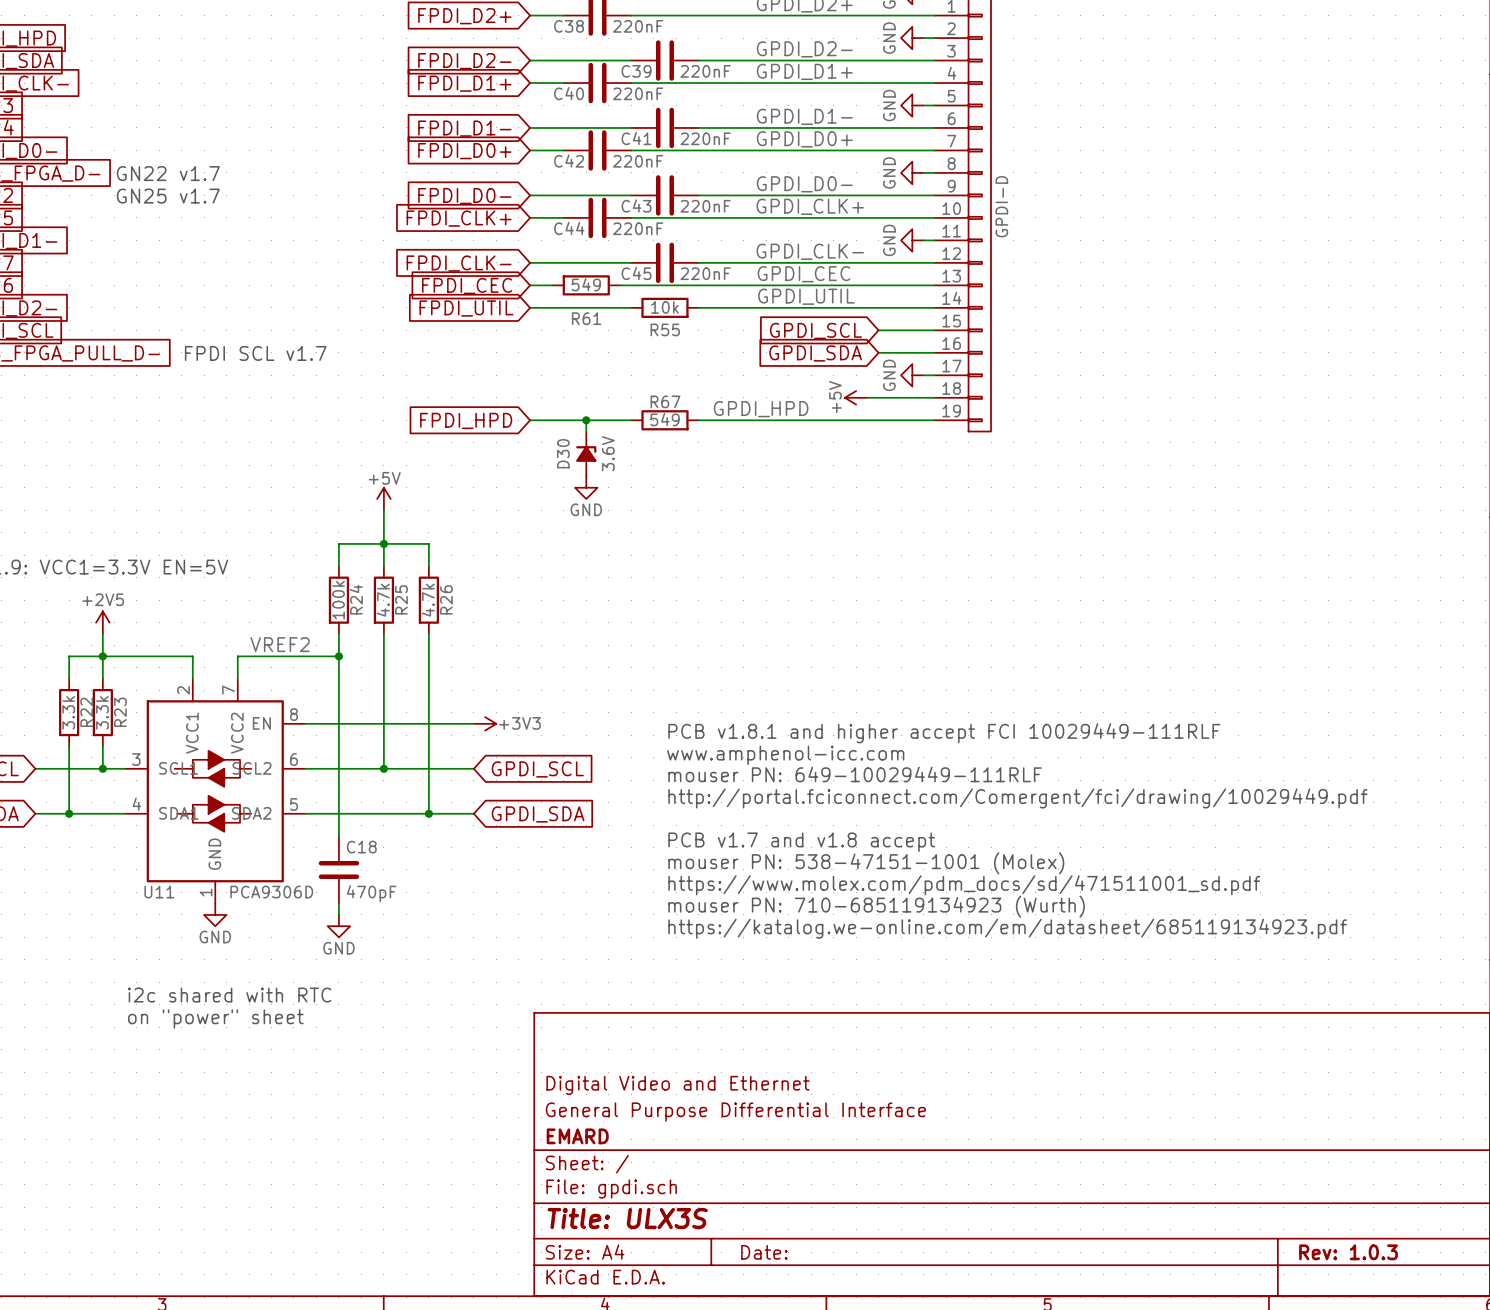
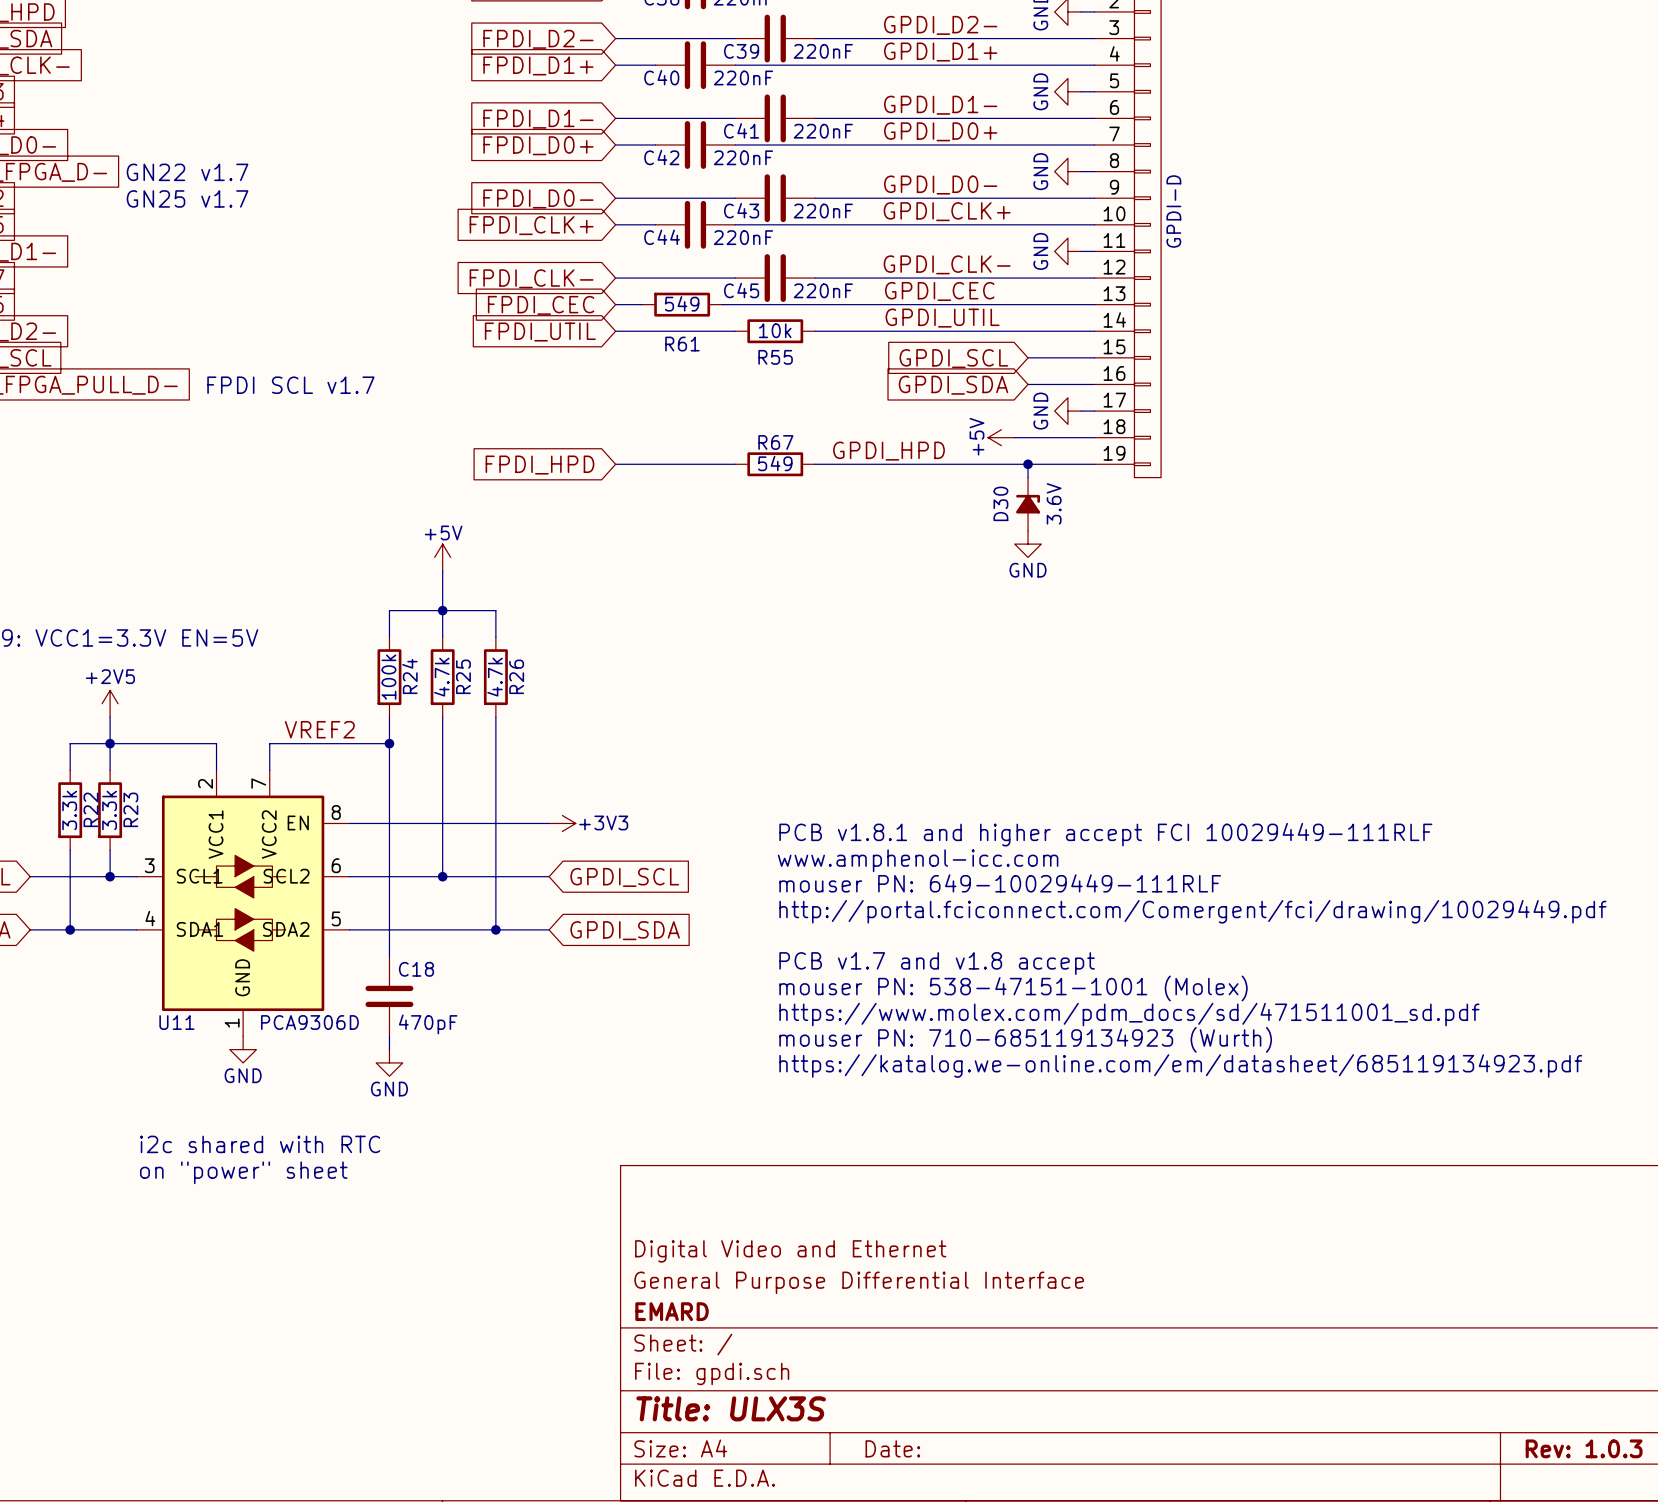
wire: (586, 420) (586, 431) -> none
junction: (586, 420) -> none
wire: none -> (1028, 464) (1028, 477)
junction: none -> (1028, 464)
D30 position: (586, 454) -> (1028, 504)
power symbol: GND (586, 487) -> none
power symbol: none -> GND (1028, 544)

